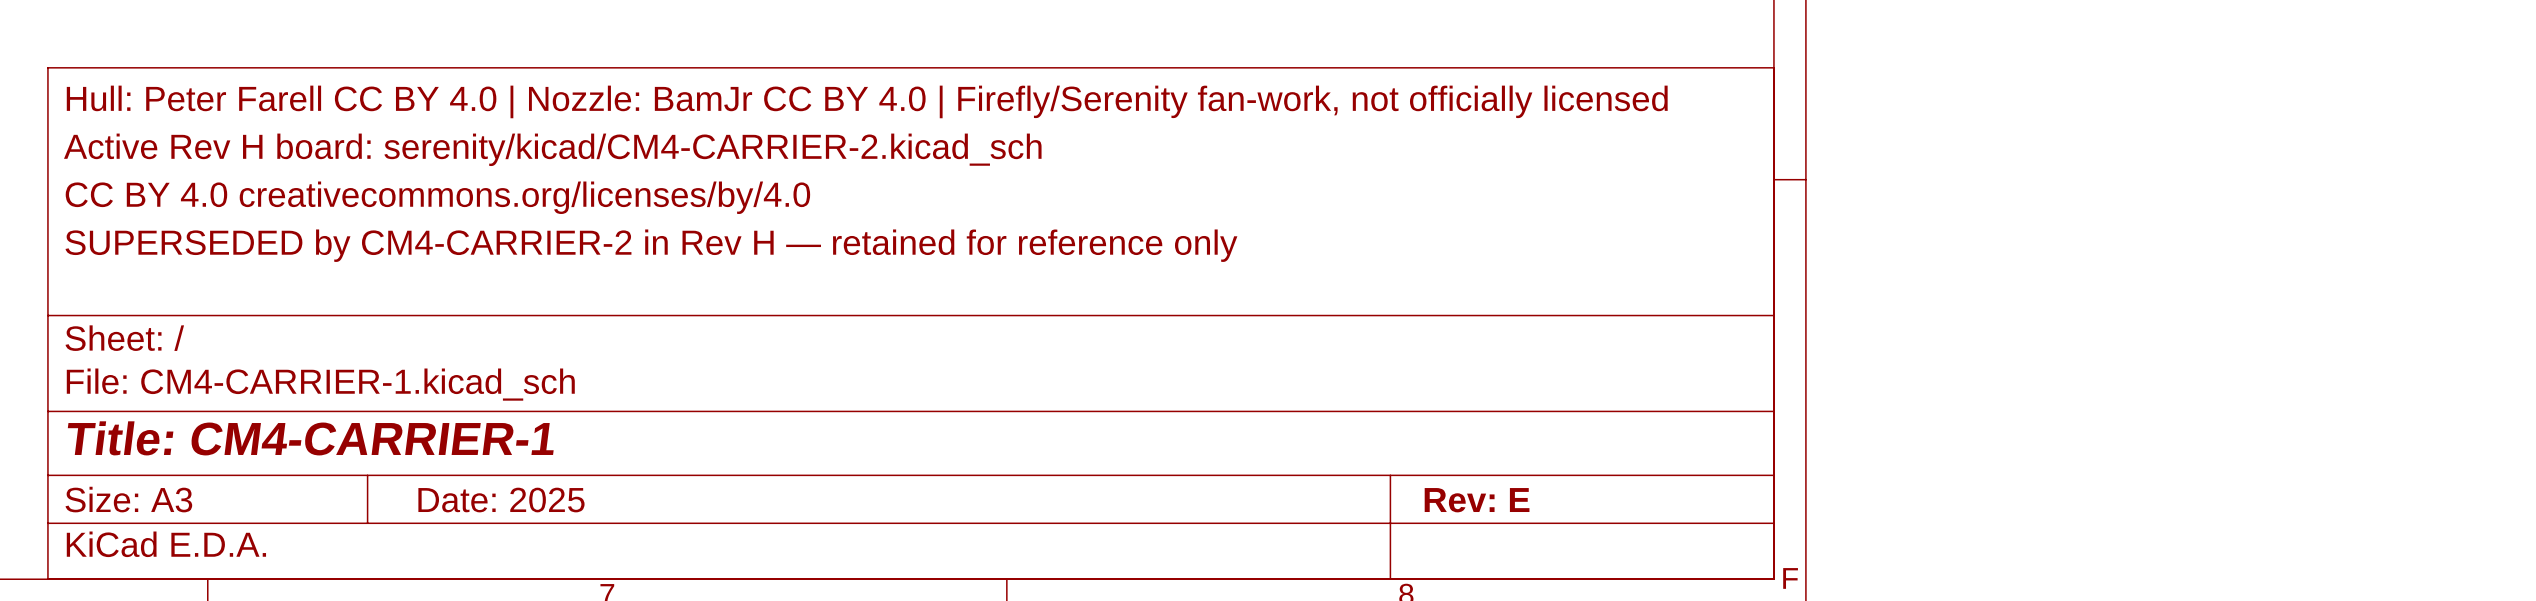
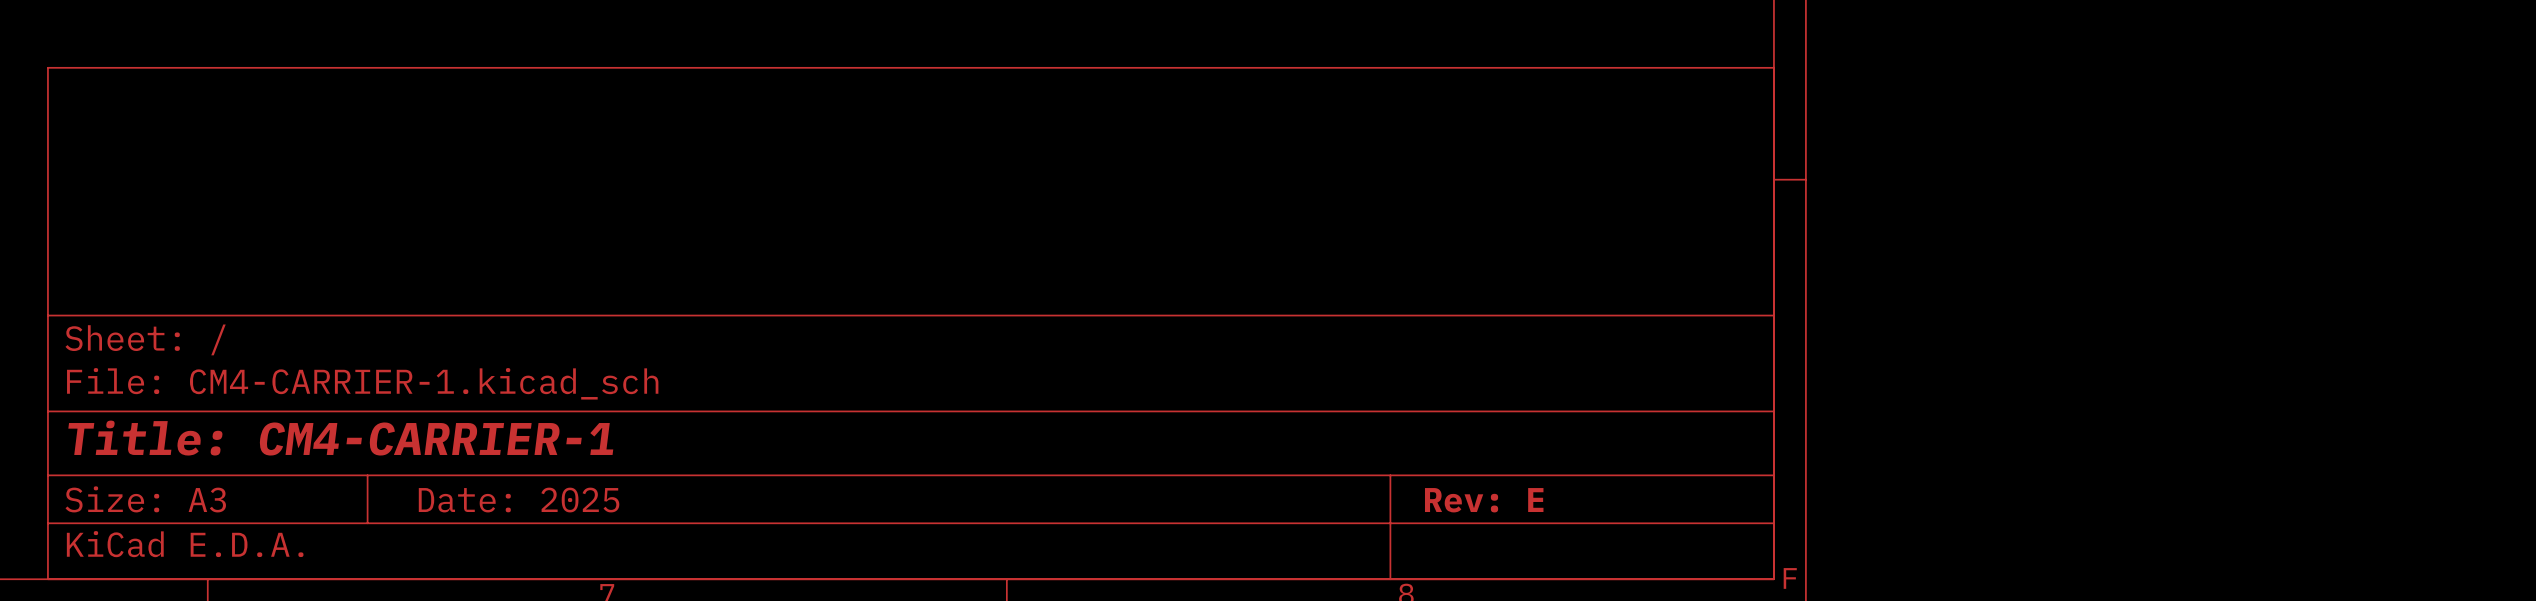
title block: Hull: Peter Farell CC BY 4.0 | Nozzle: BamJr CC BY 4.0 | Firefly/Serenity fan-work, not officially licensed (867, 101) -> none
title block: Active Rev H board: serenity/kicad/CM4-CARRIER-2.kicad_sch (552, 149) -> none
title block: CC BY 4.0 creativecommons.org/licenses/by/4.0 (437, 197) -> none
title block: SUPERSEDED by CM4-CARRIER-2 in Rev H — retained for reference only (651, 245) -> none

